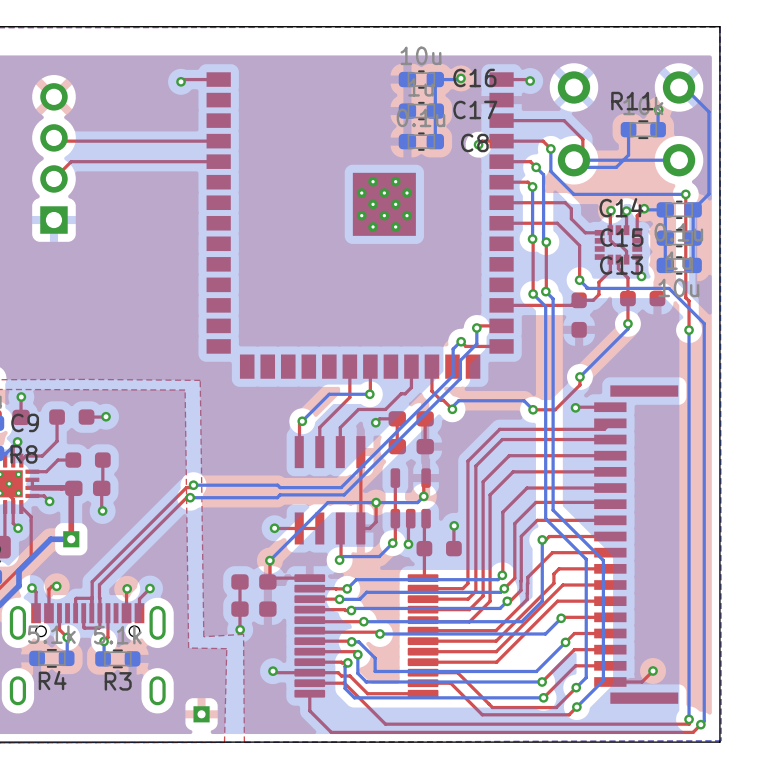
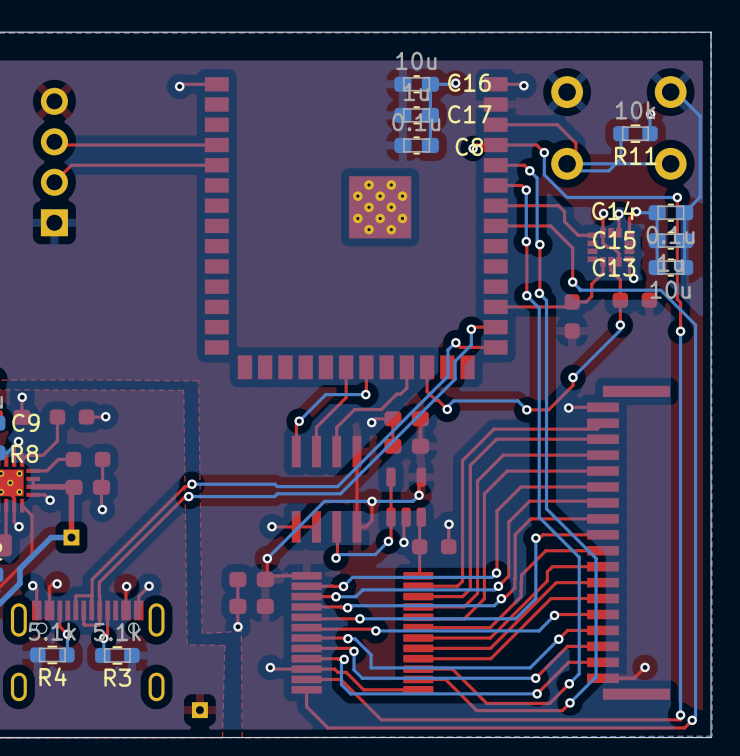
R11 name position: R11 (632, 101) -> R11 (635, 155)

